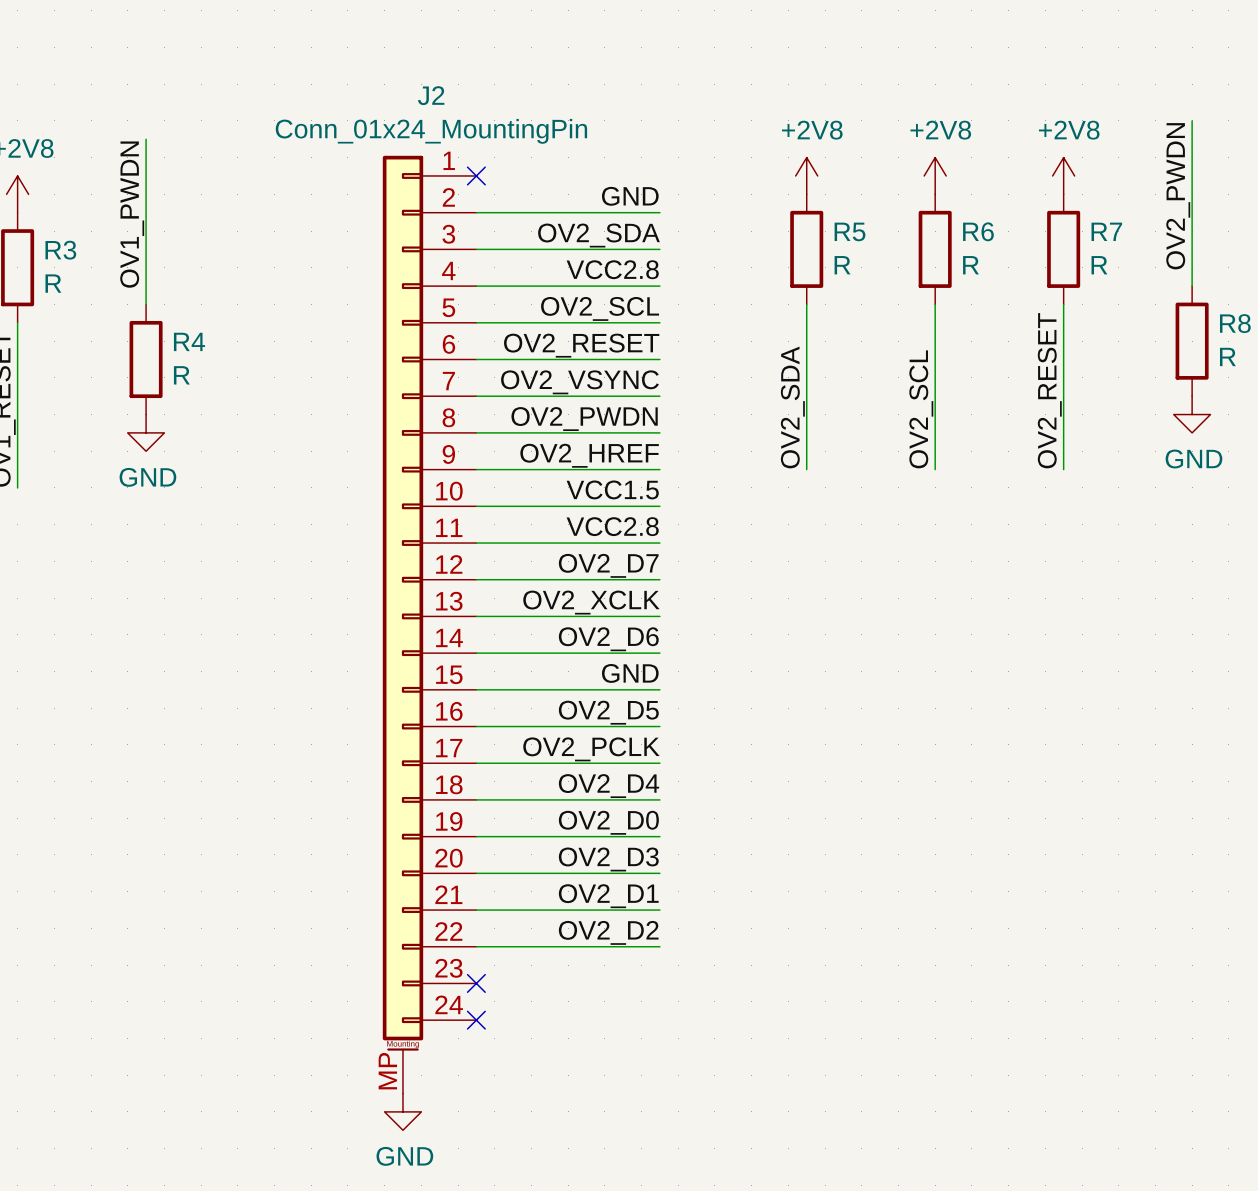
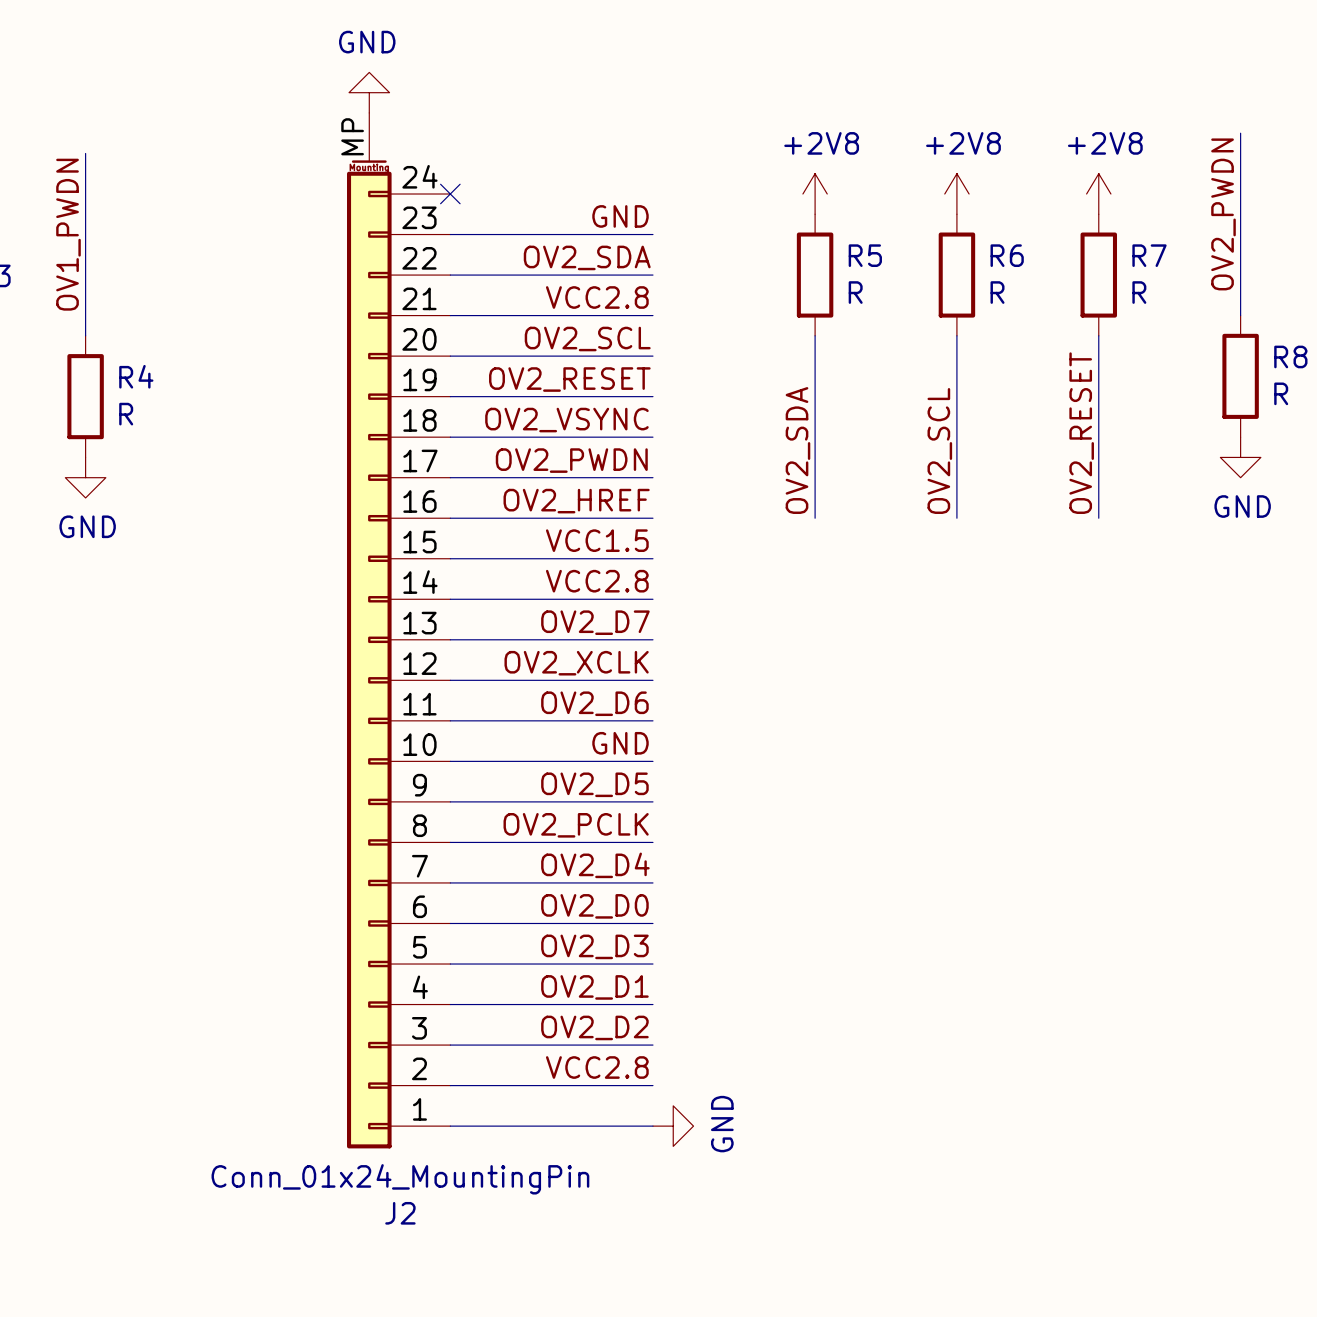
power symbol: none -> GND (369, 92)
J2 flip: as is (402, 603) -> up-down (369, 654)
label: none -> VCC2.8 (597, 1067)
wire: none -> (450, 1085) (652, 1085)
no-connect mark: (476, 983) -> none
wire: none -> (450, 1126) (652, 1126)
no-connect mark: (476, 1020) -> none
power symbol rotation: 0° (402, 1111) -> 90° counterclockwise (673, 1126)
power symbol position: GND (402, 1111) -> GND (673, 1126)

